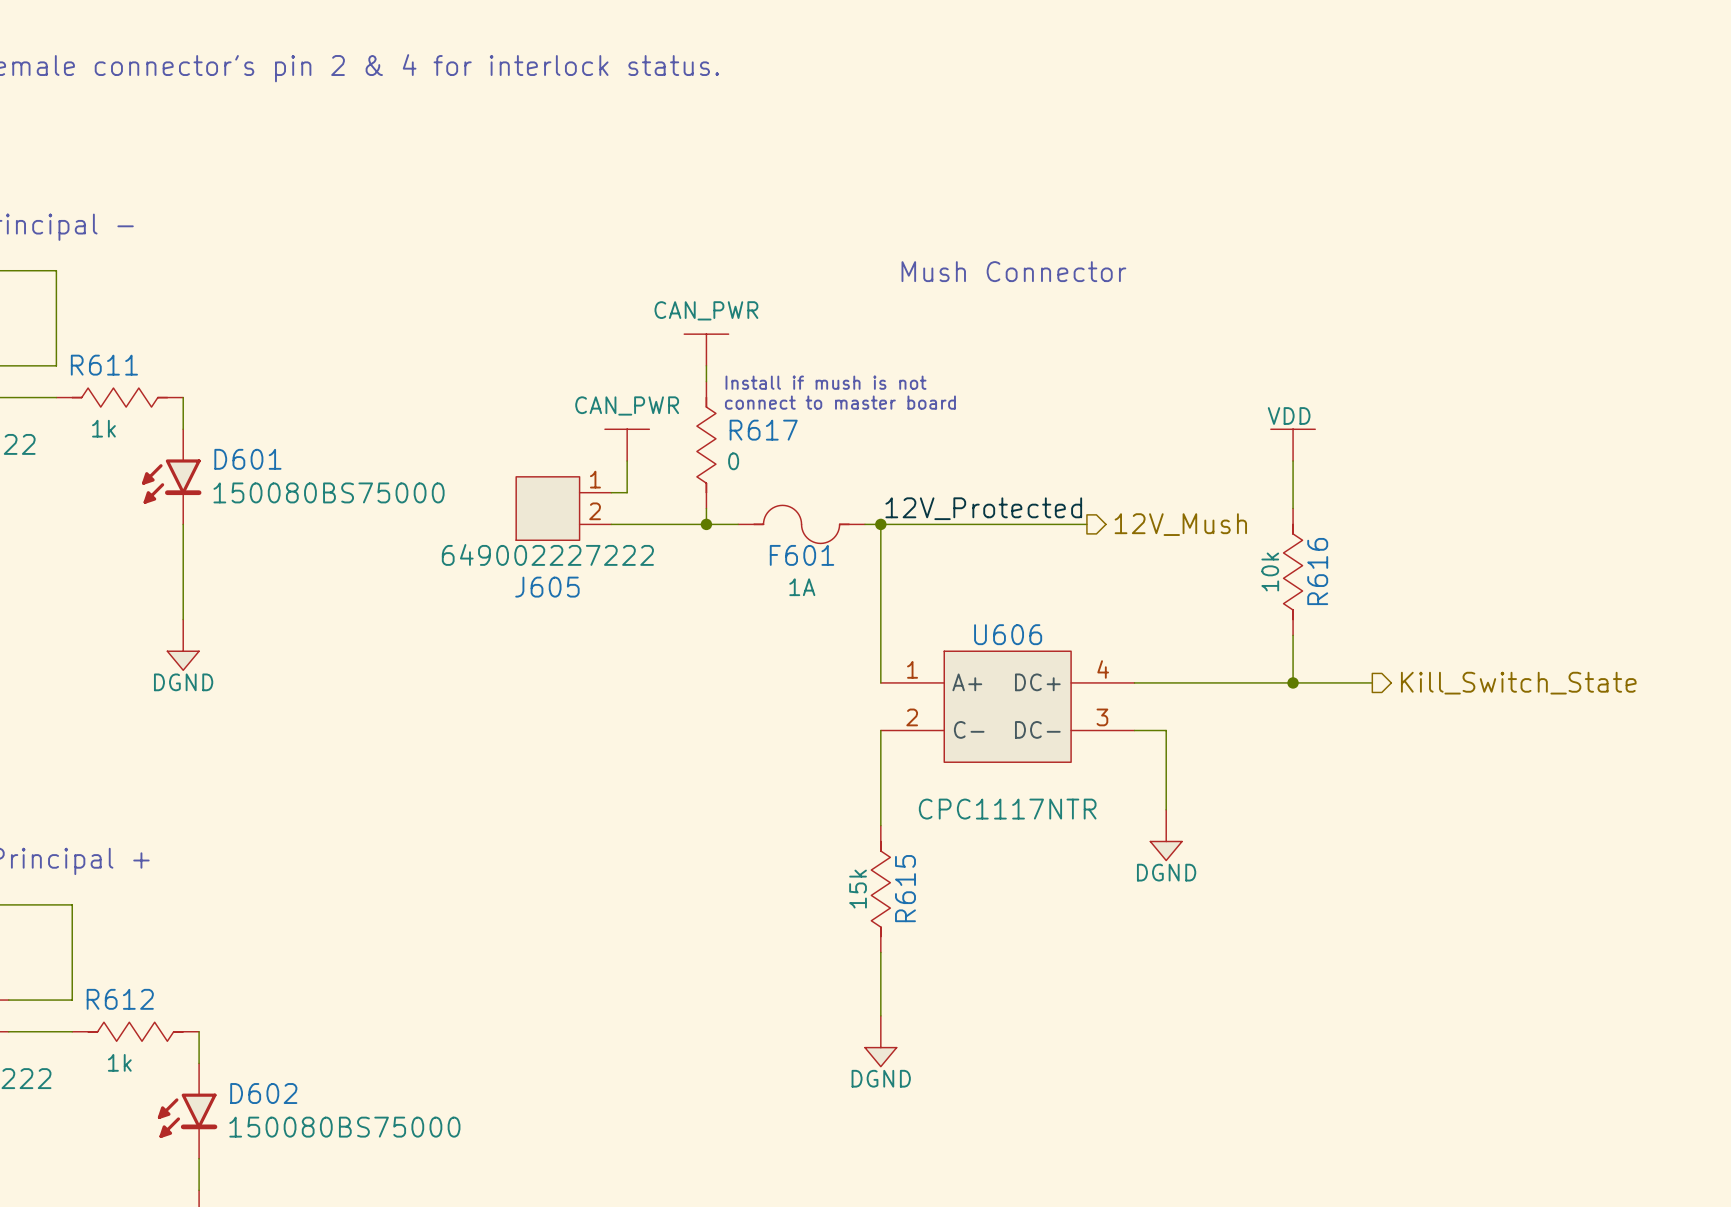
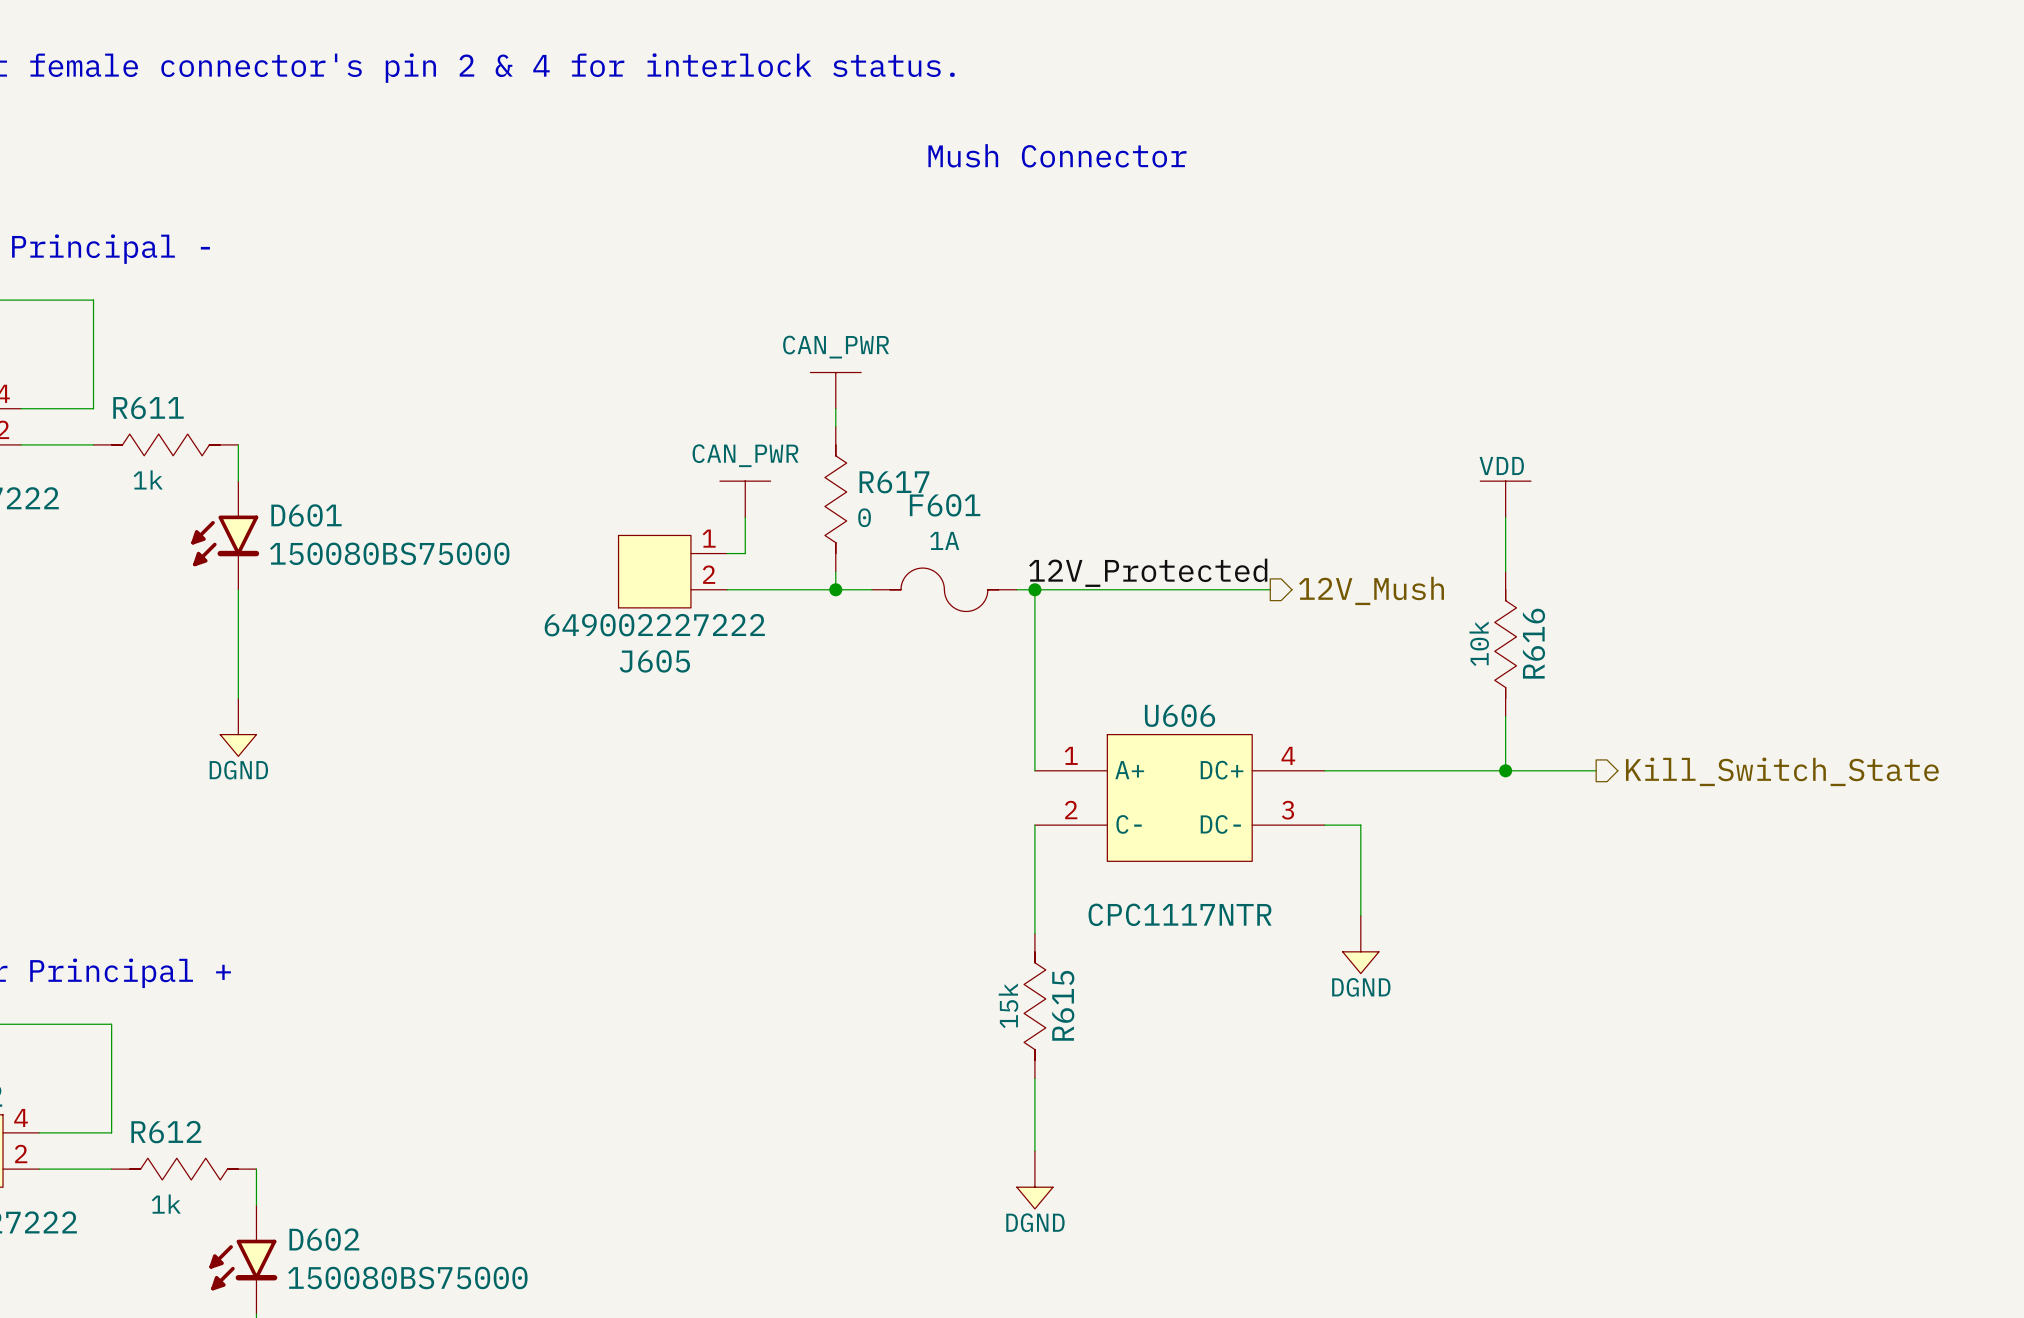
text position: Mush Connector (1013, 271) -> Mush Connector (1057, 155)
text: Install if mush is not (826, 382) -> none
text: connect to master board (840, 402) -> none
F601 name position: F601 (802, 555) -> F601 (945, 505)
F601 text position: 1A (802, 587) -> 1A (944, 540)

